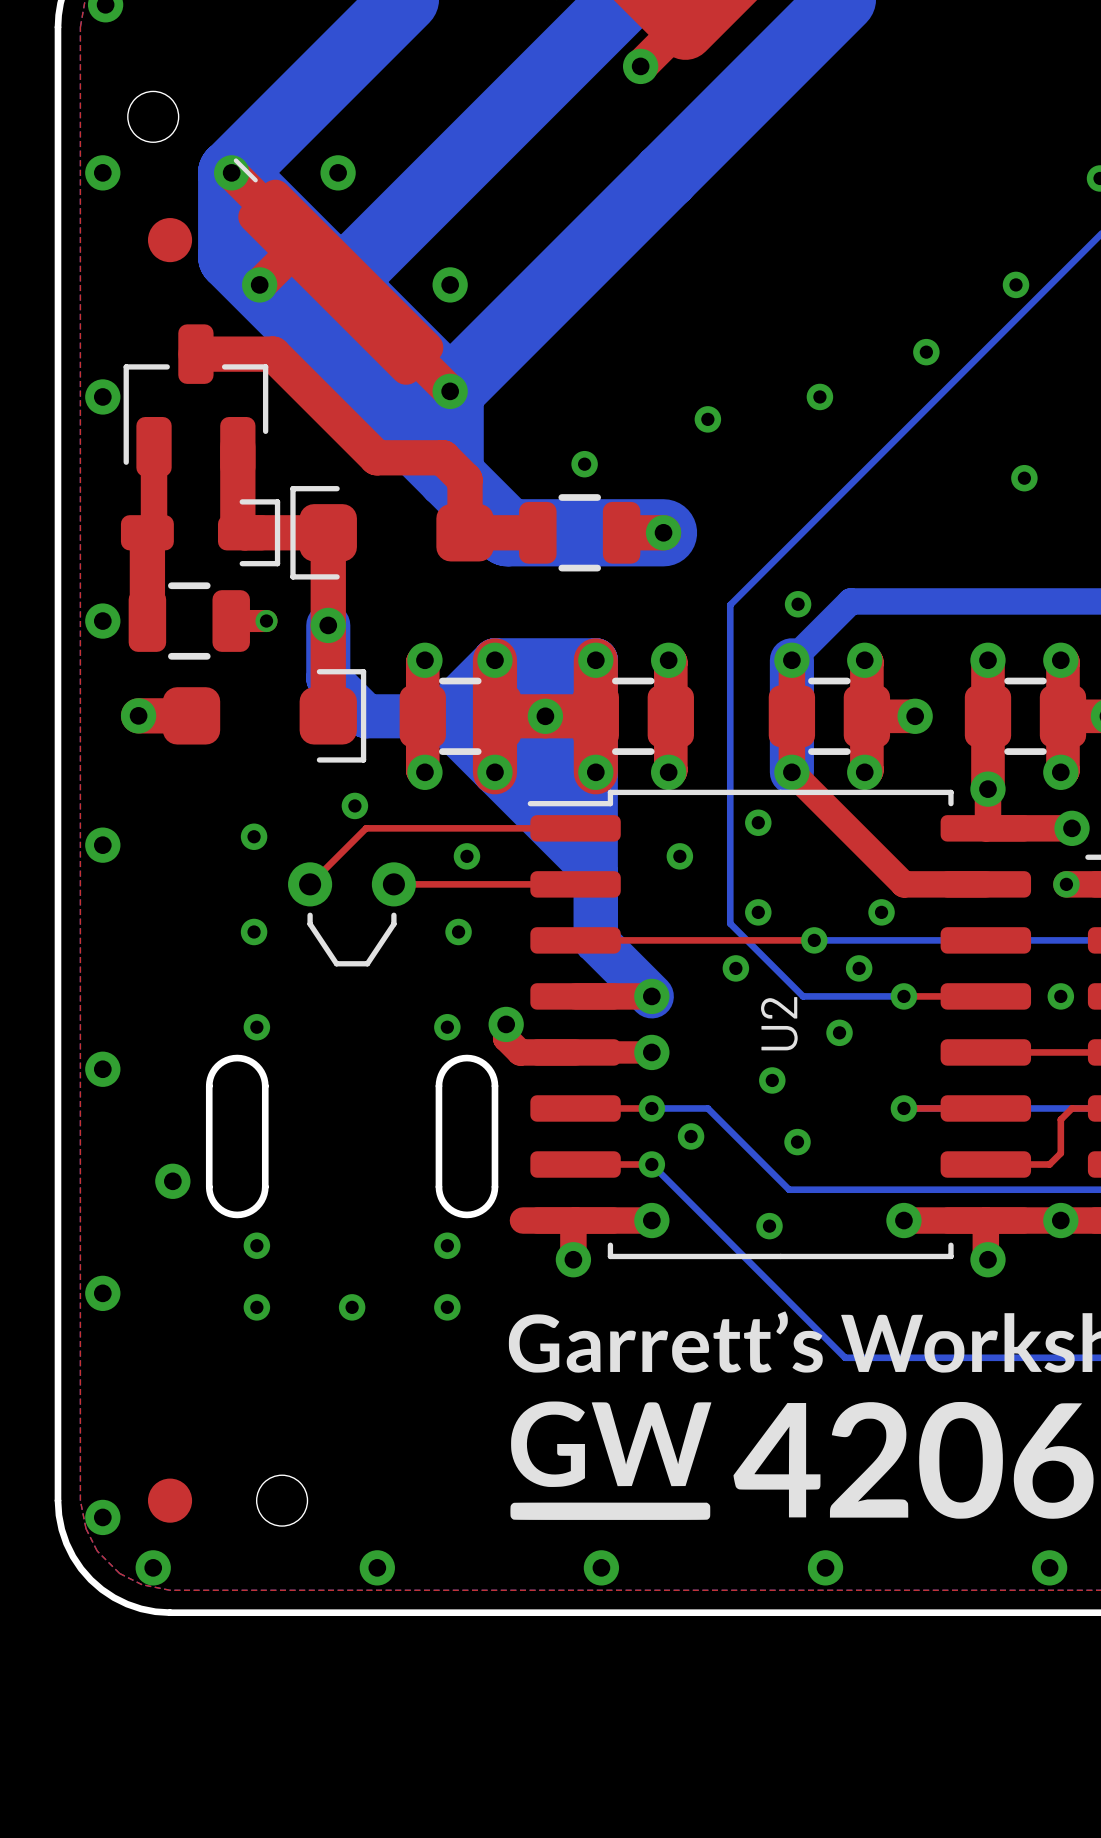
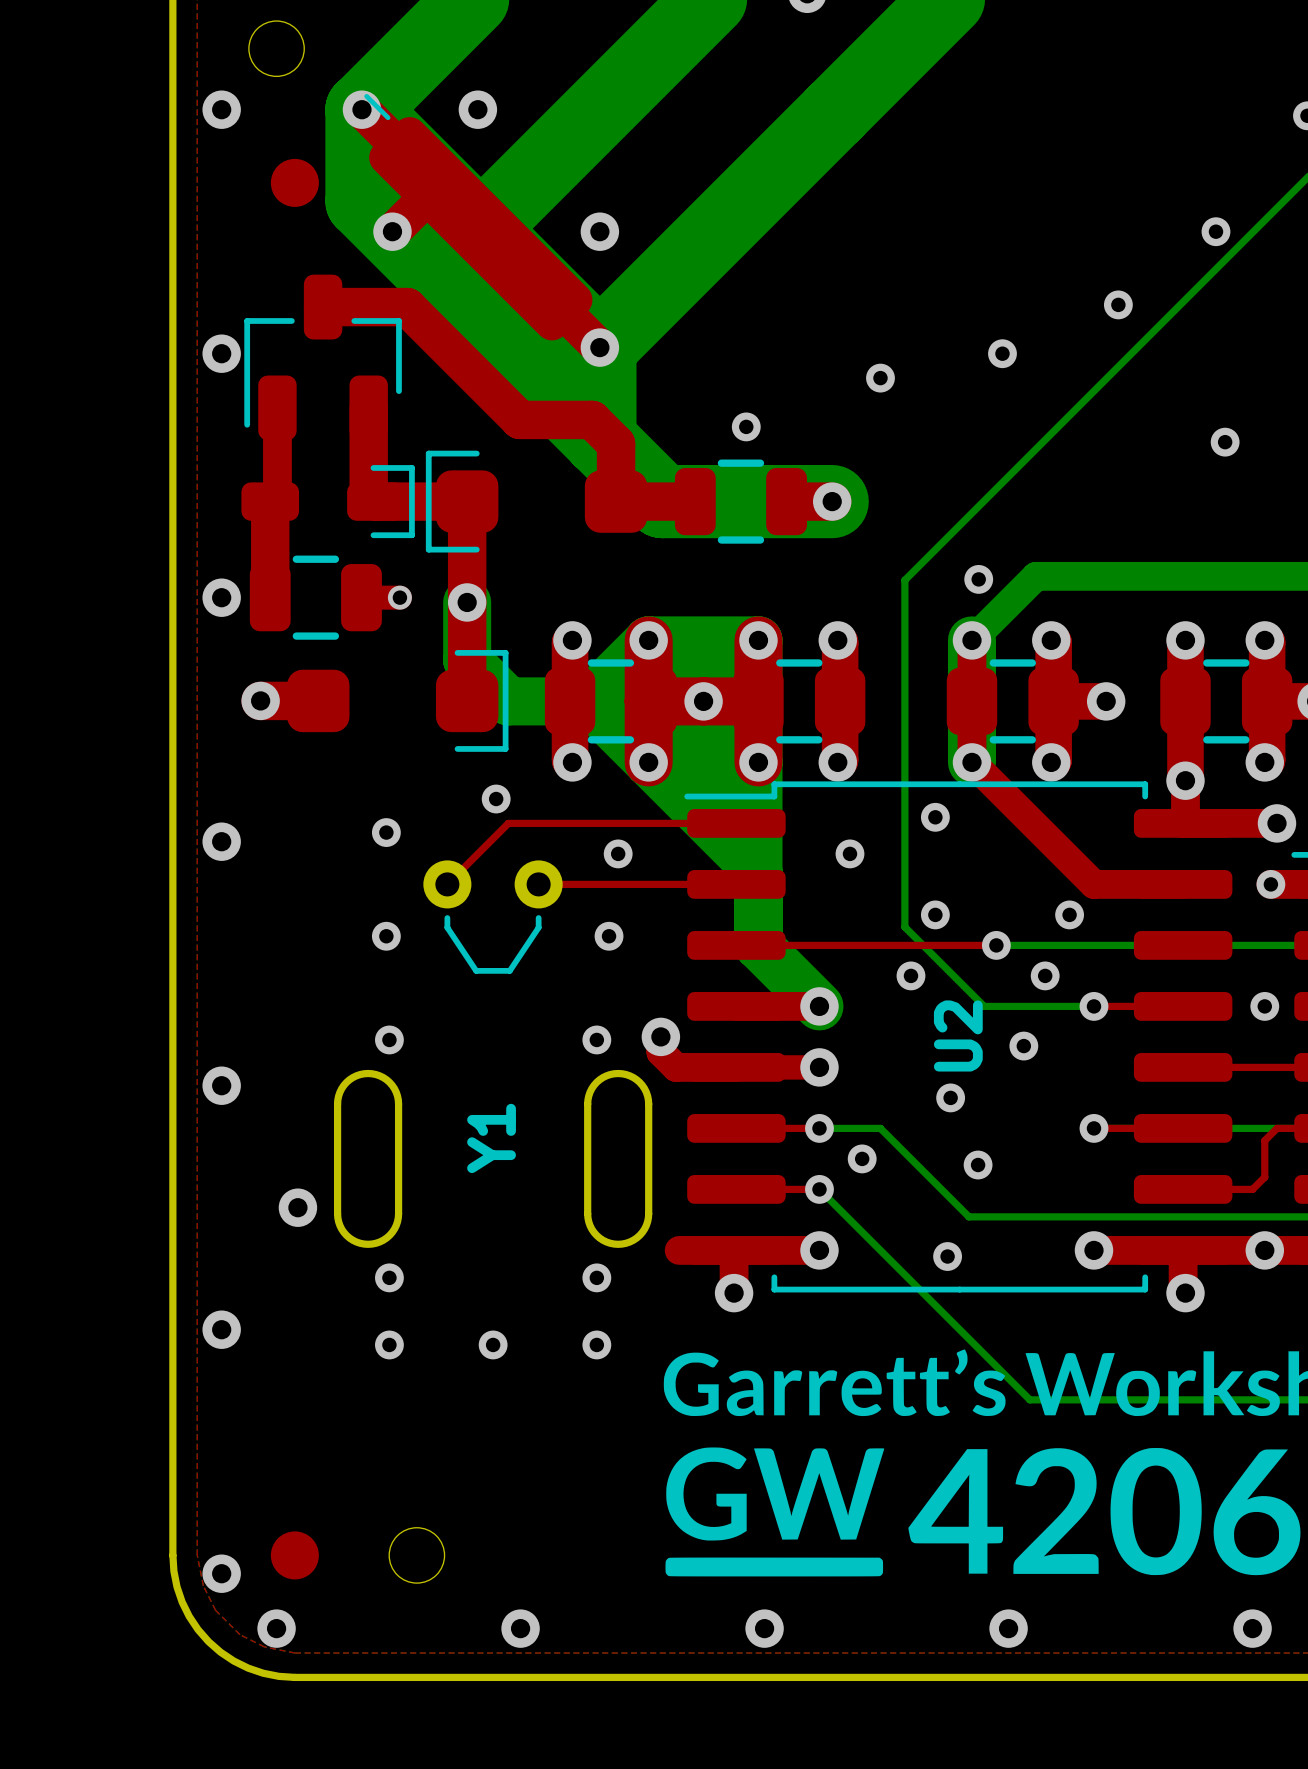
Y1 name: none -> Y1 (491, 1138)

